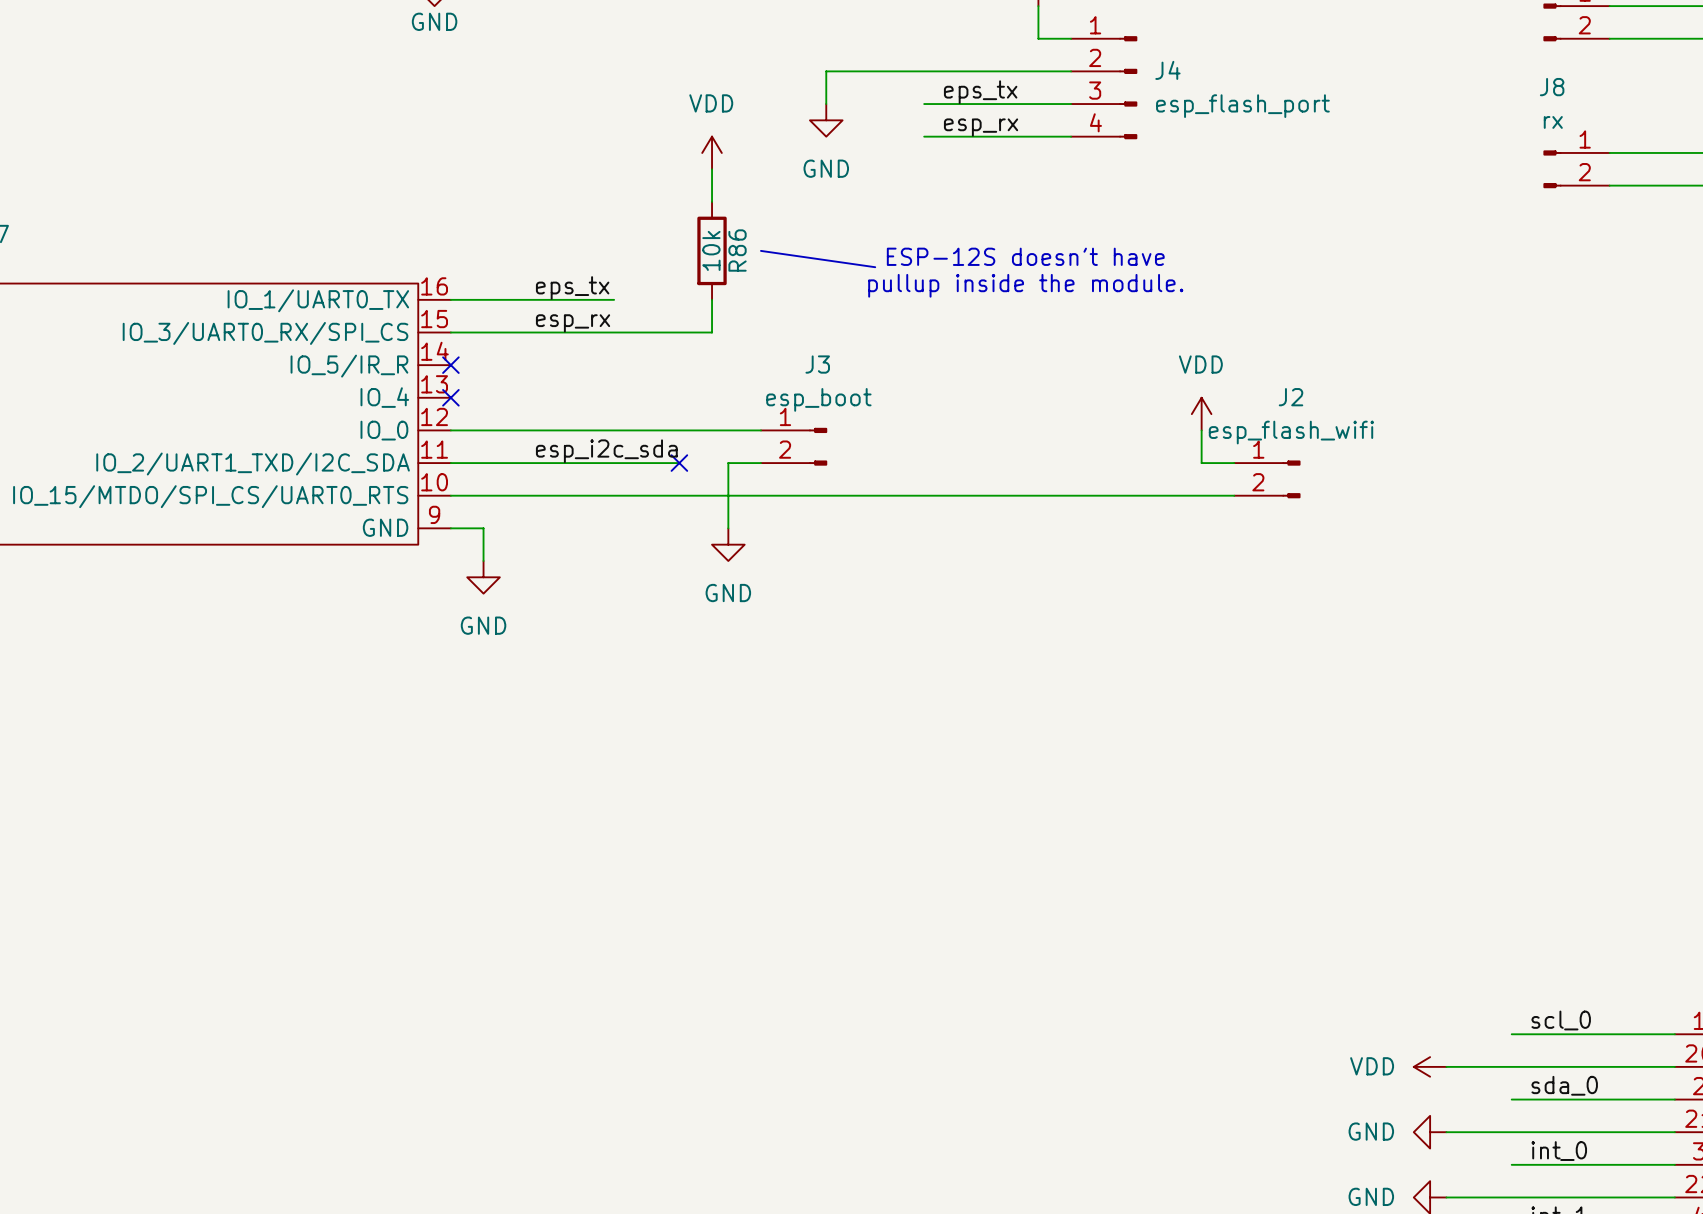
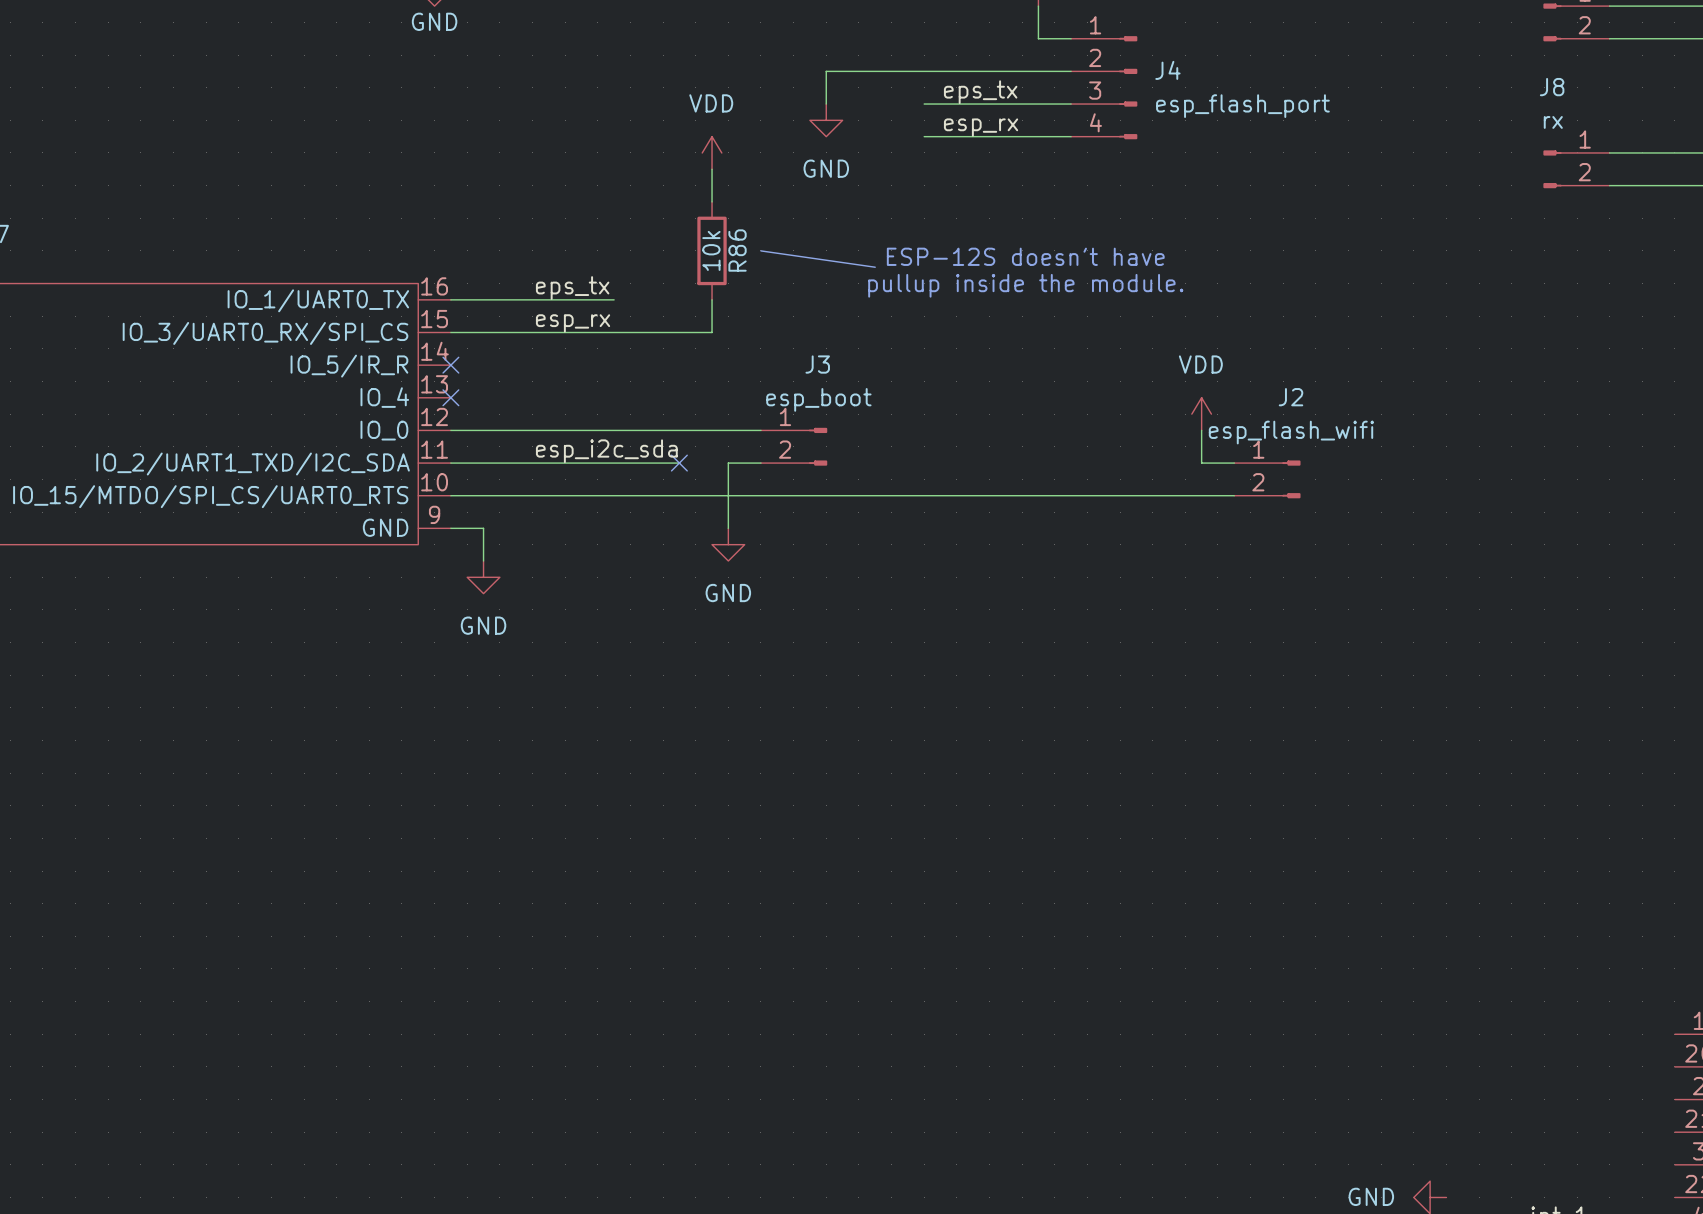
label: scl_0 (1561, 1020) -> none
wire: (1511, 1034) (1674, 1034) -> none
power symbol: VDD (1430, 1066) -> none
wire: (1446, 1066) (1674, 1066) -> none
label: sda_0 (1564, 1085) -> none
wire: (1511, 1099) (1674, 1099) -> none
power symbol: GND (1430, 1132) -> none
wire: (1446, 1132) (1674, 1132) -> none
label: int_0 (1559, 1151) -> none
wire: (1511, 1164) (1674, 1164) -> none
wire: (1446, 1197) (1674, 1197) -> none

